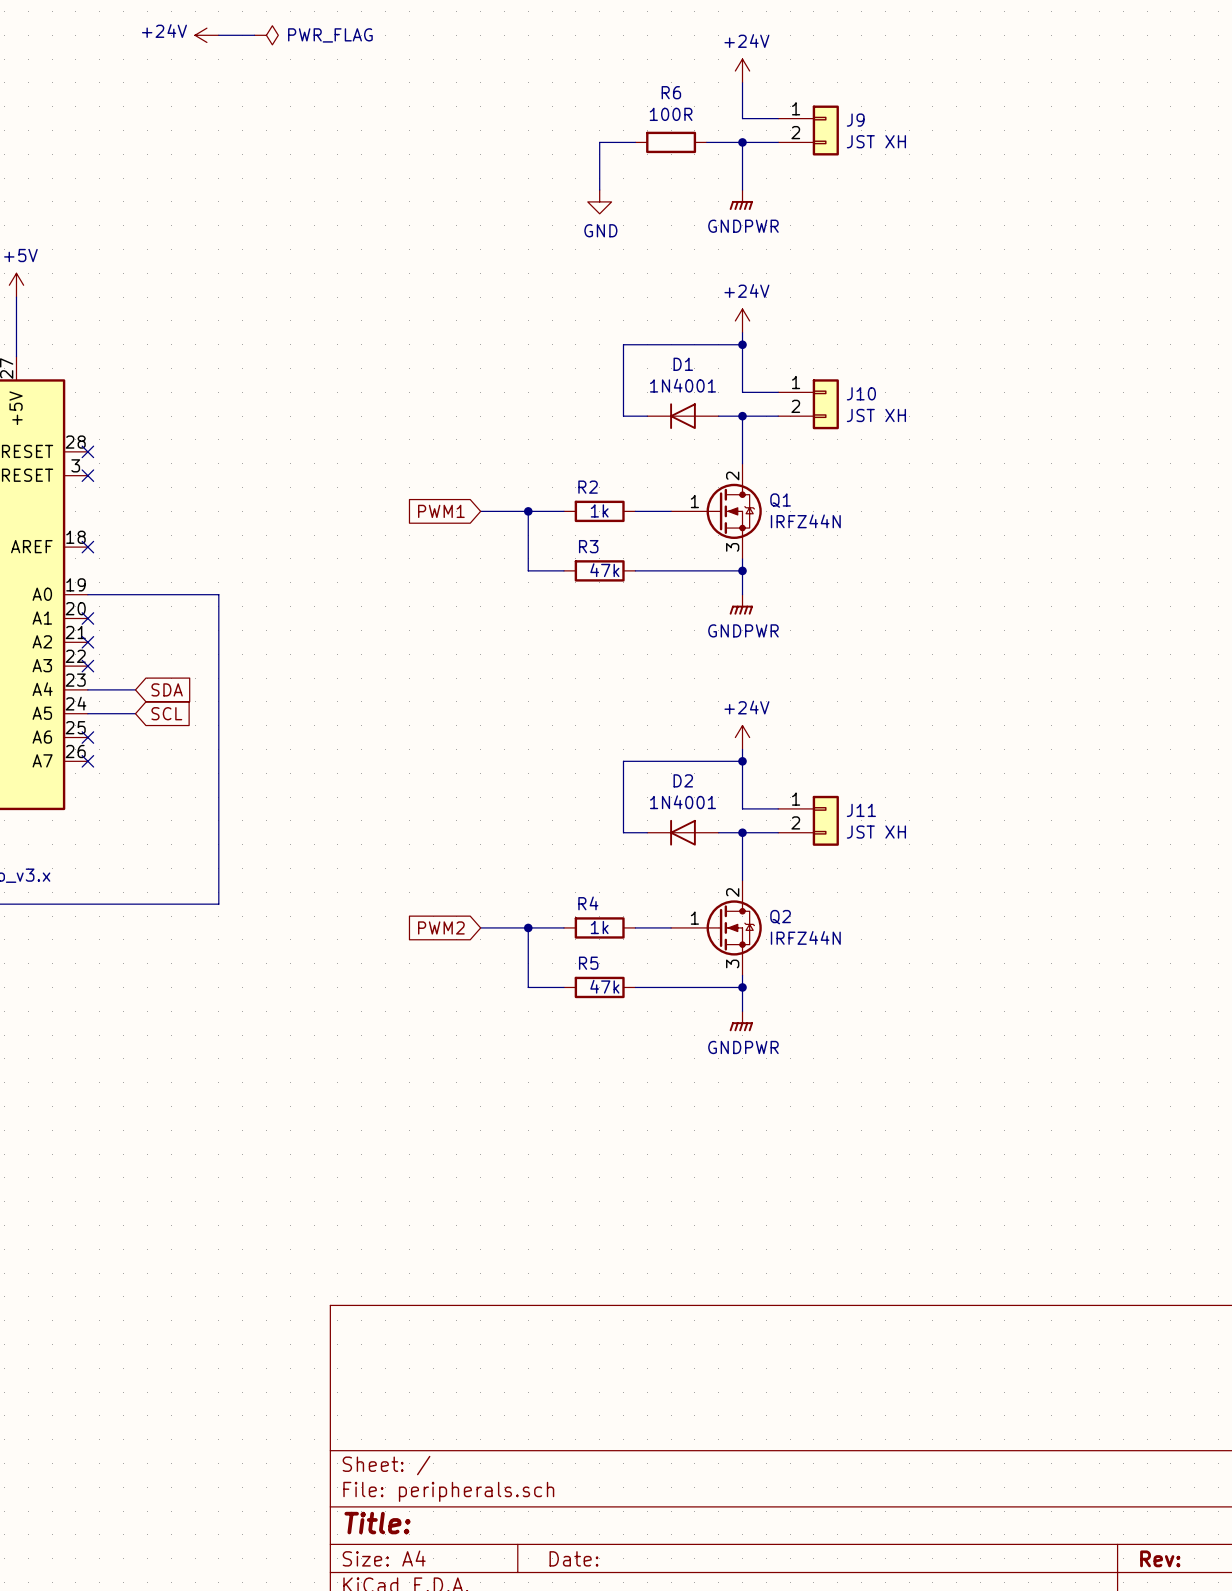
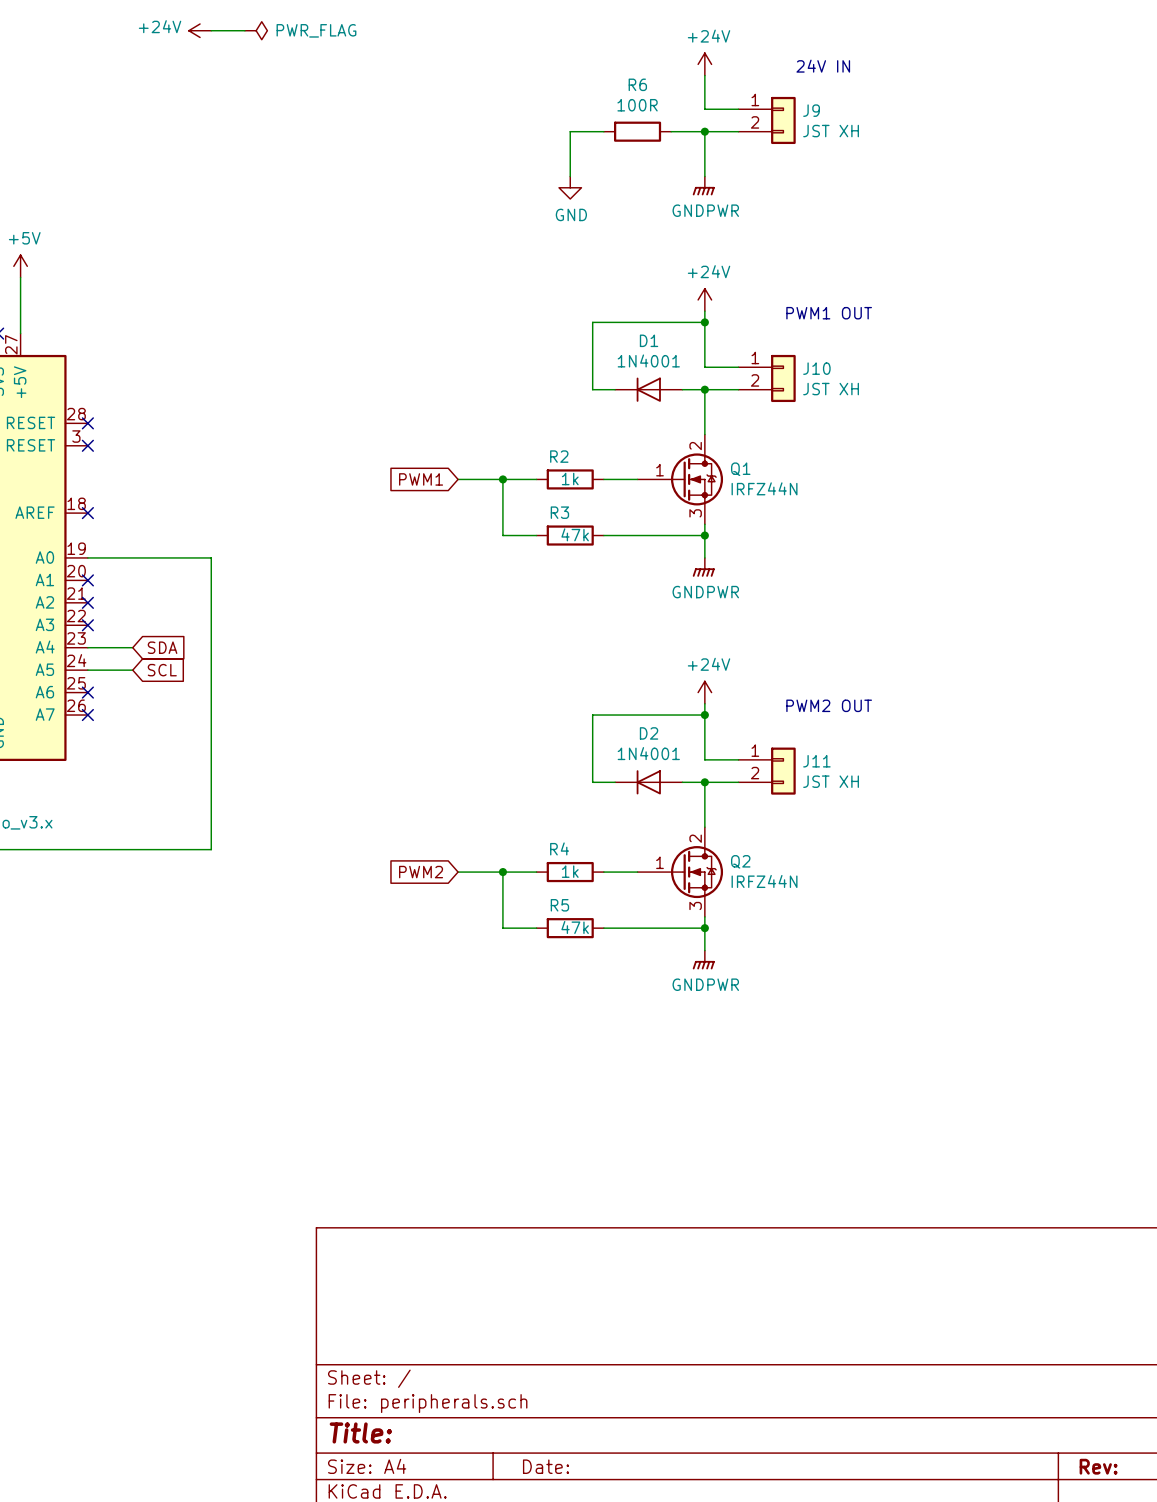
text: none -> 24V IN (823, 66)
text: none -> PWM1 OUT (829, 313)
text: none -> PWM2 OUT (829, 705)

